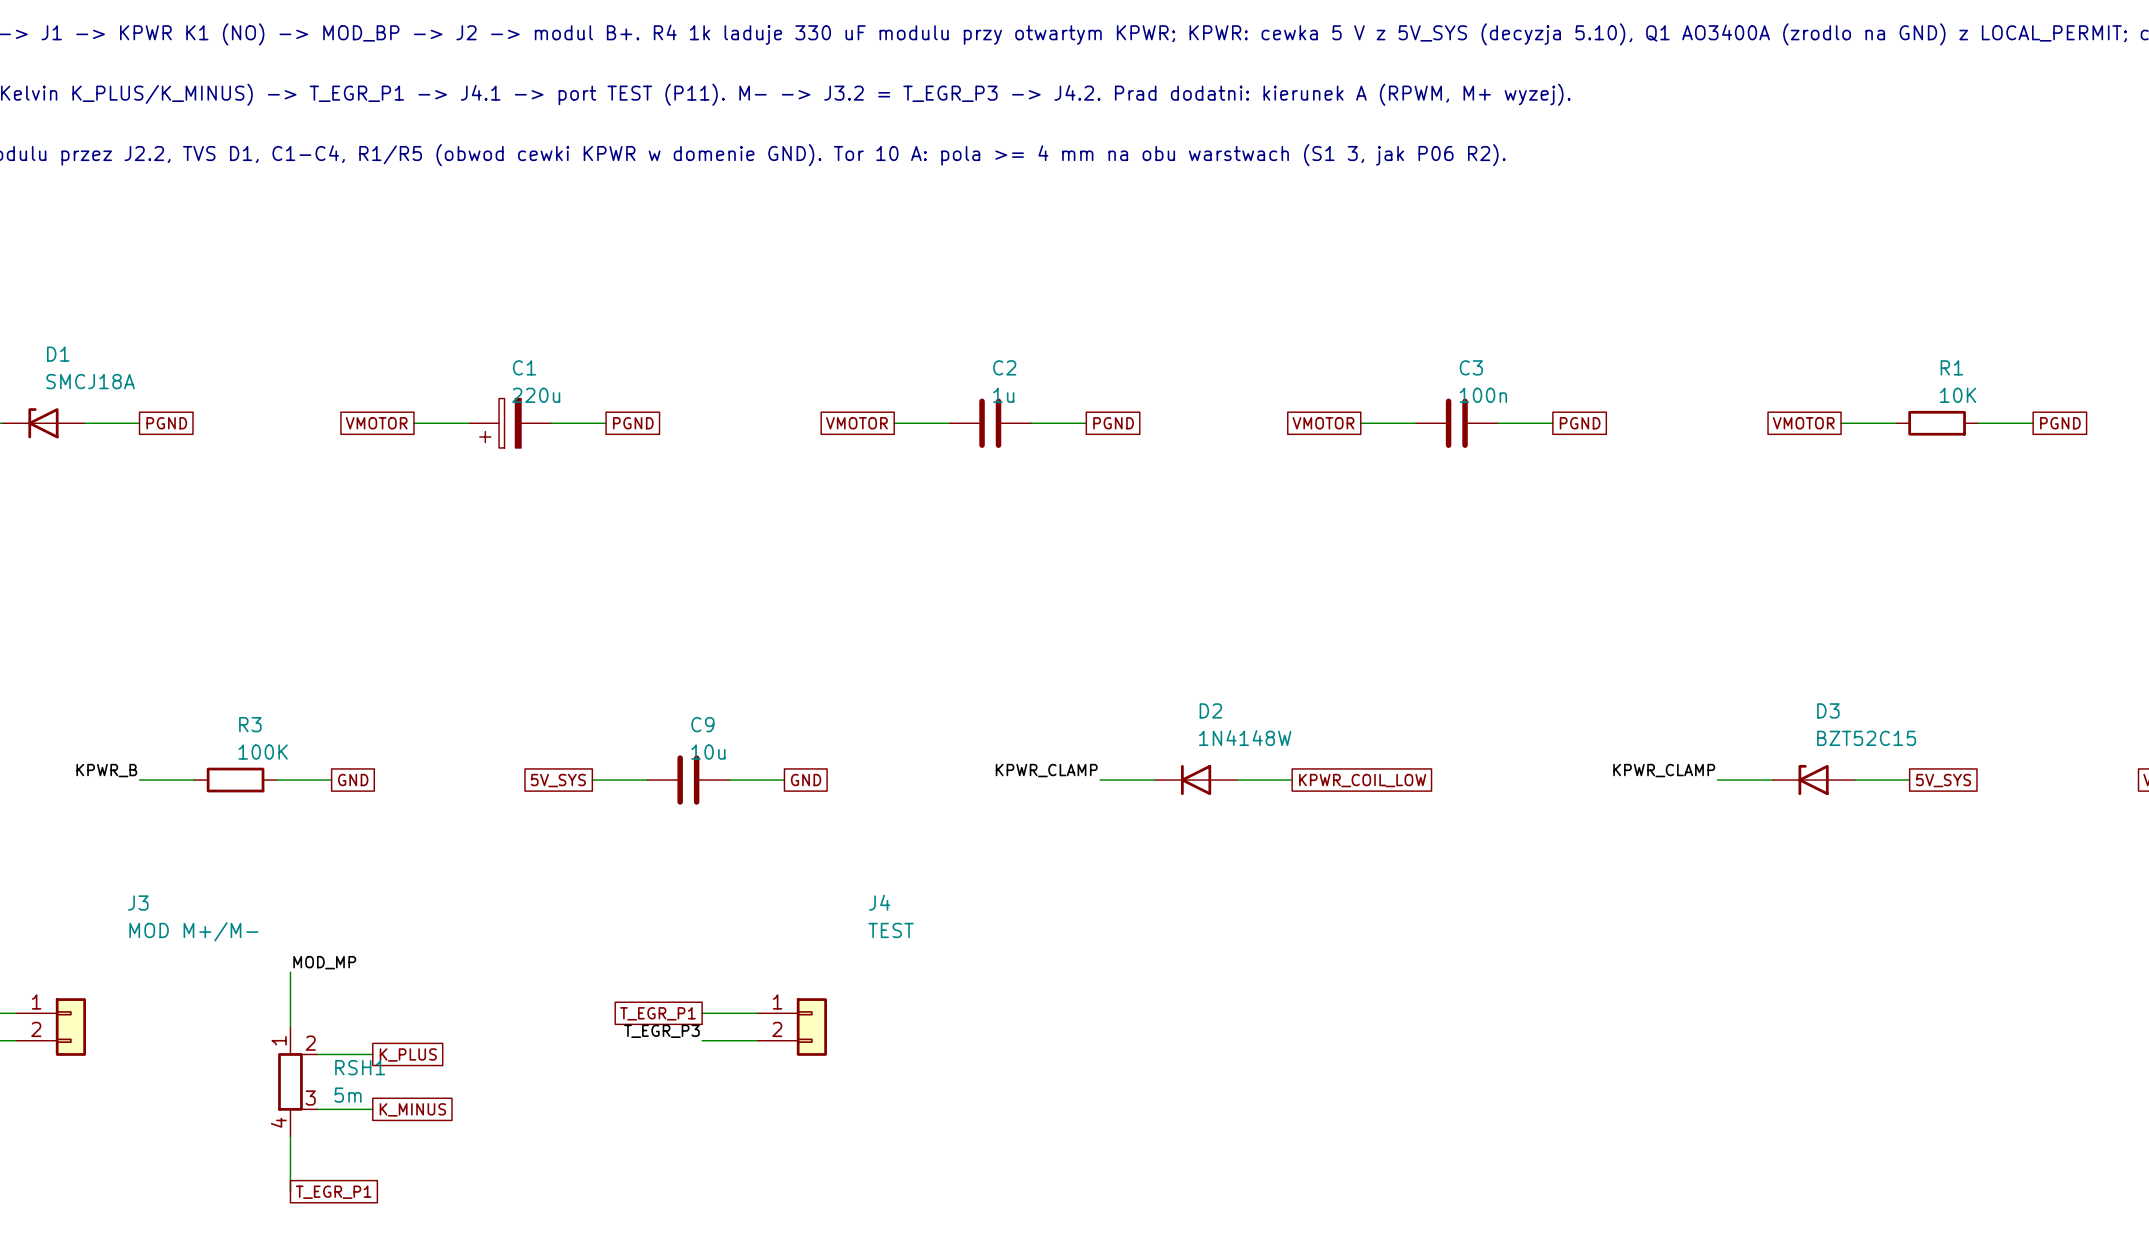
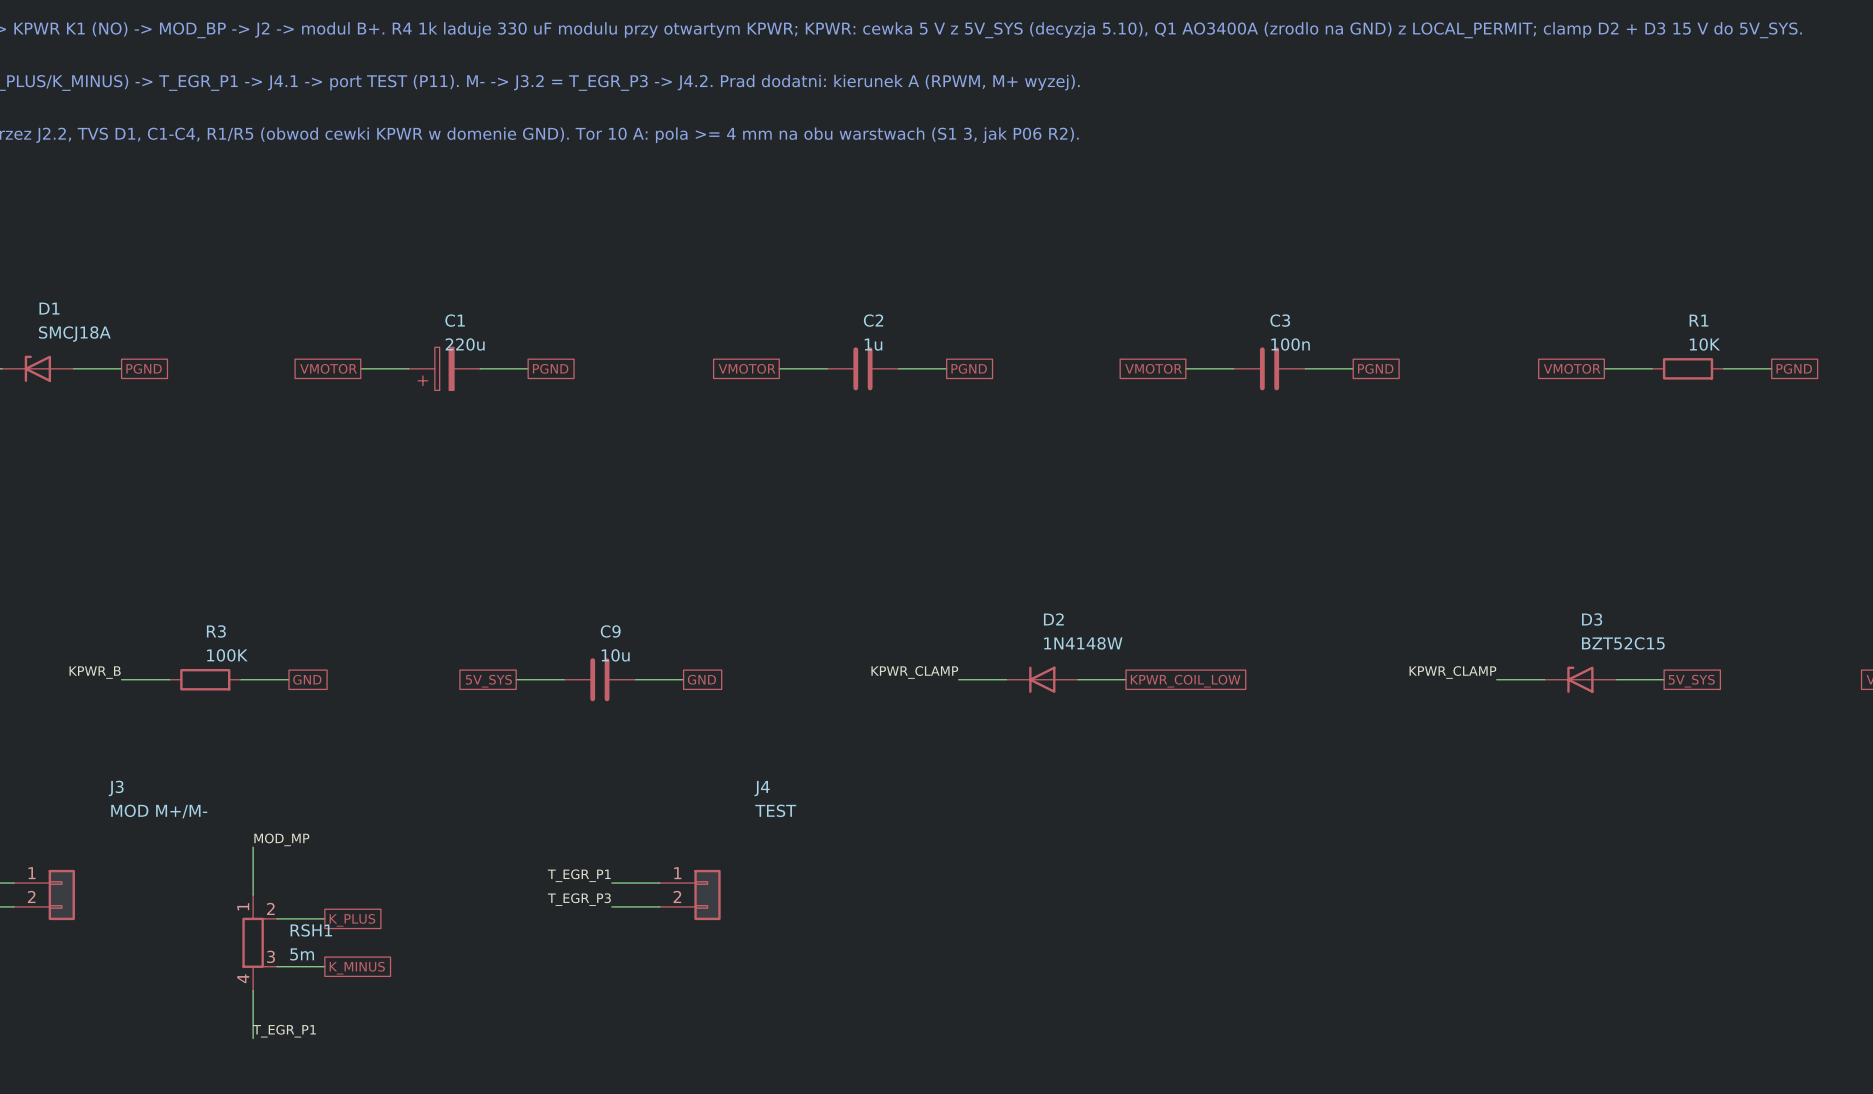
label: none -> T_EGR_P1 (579, 875)
global label: T_EGR_P1 (657, 1013) -> none
label: none -> T_EGR_P1 (284, 1031)
global label: T_EGR_P1 (333, 1192) -> none

